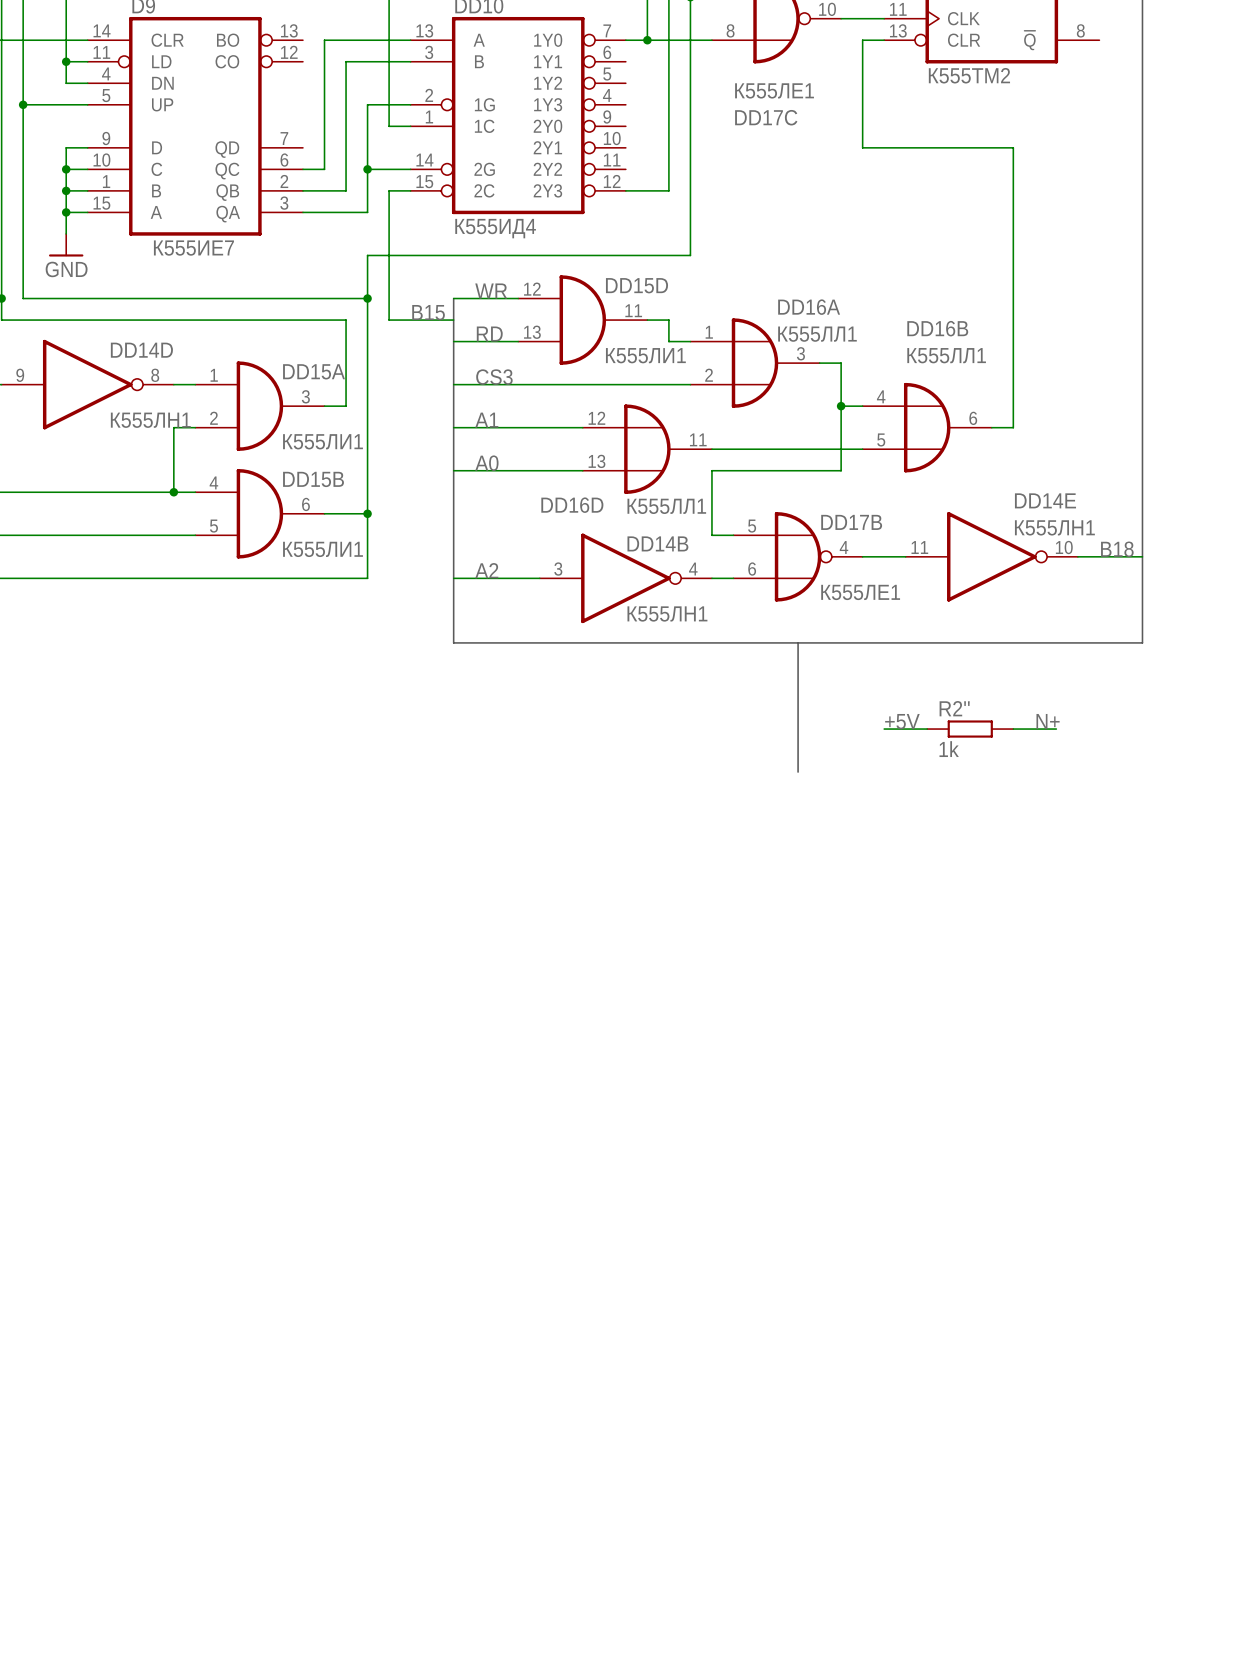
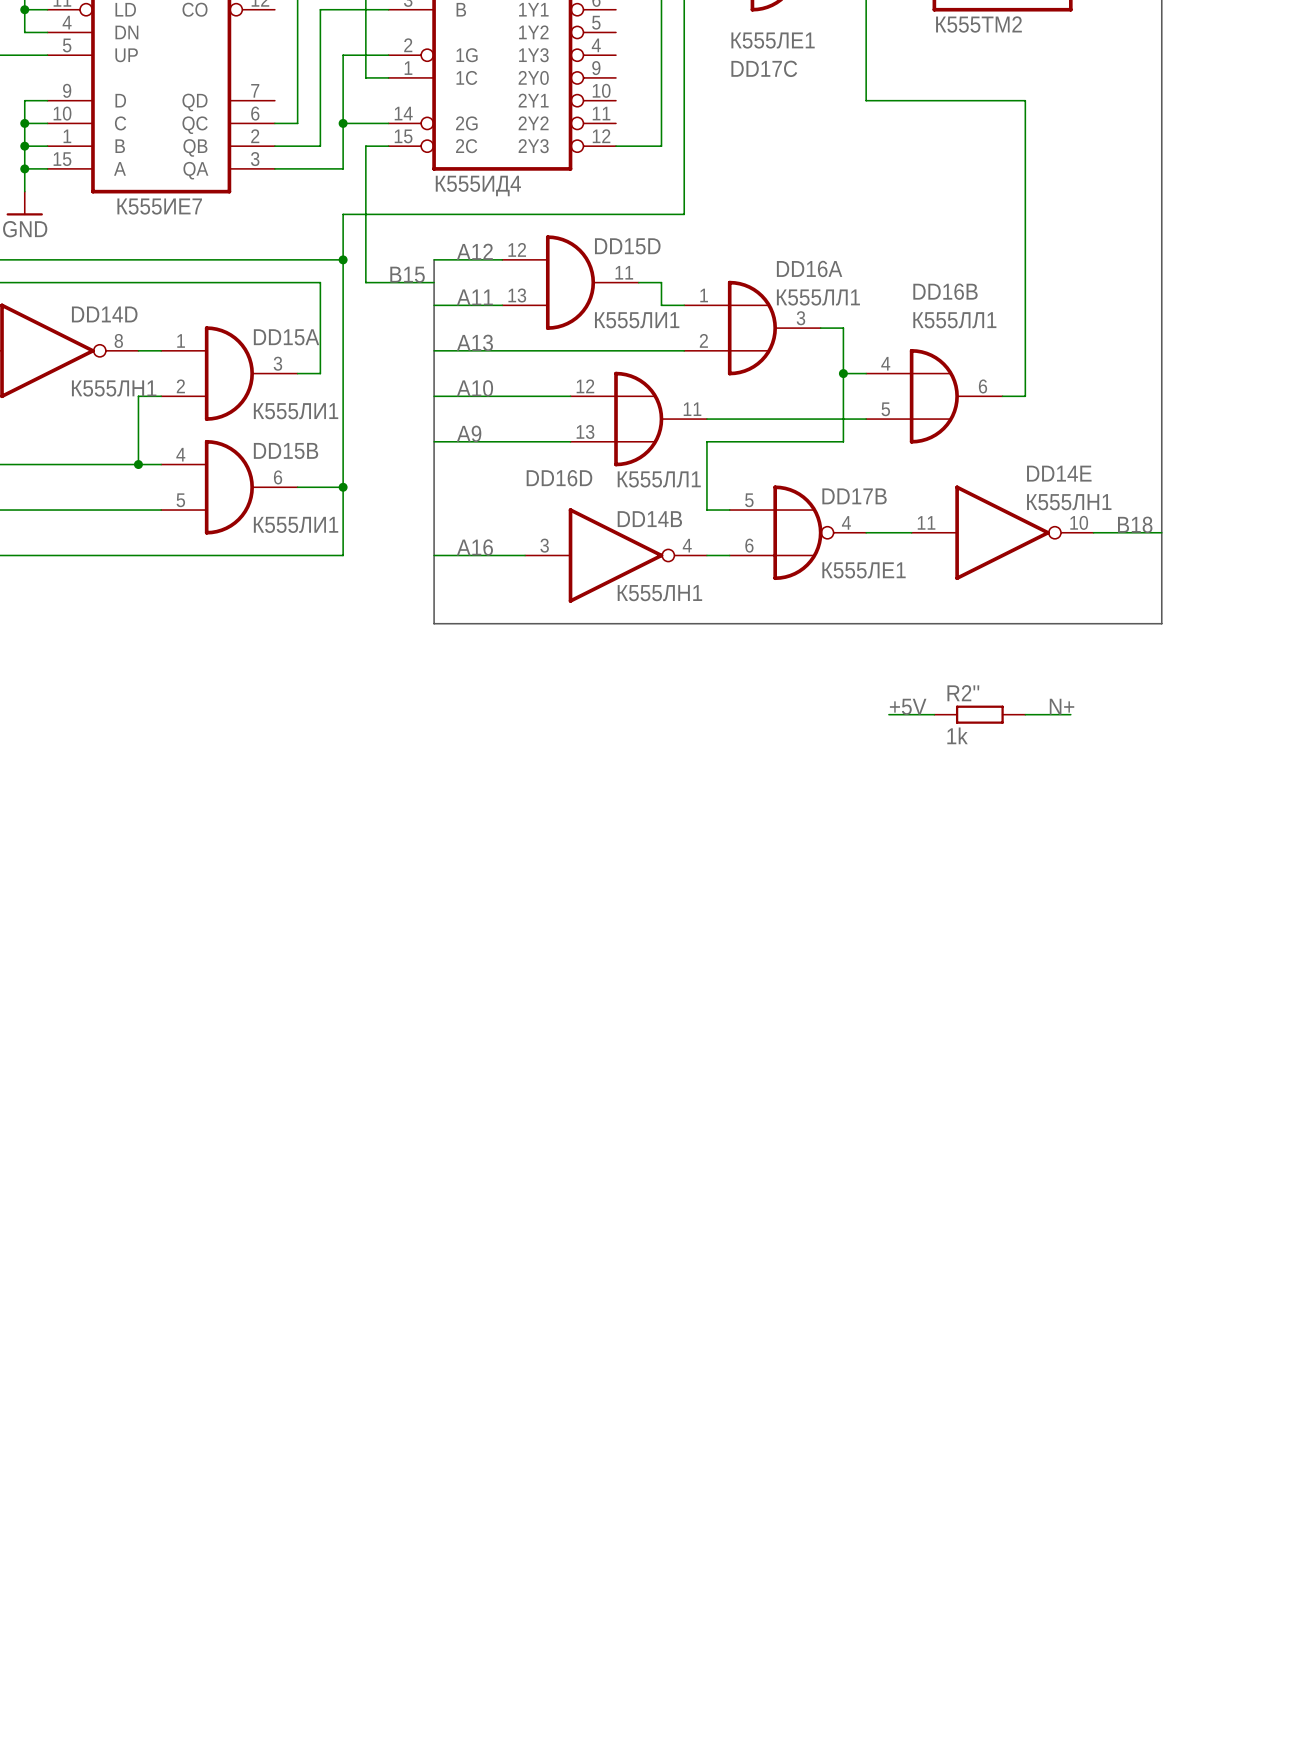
label: WR (491, 290) -> A12 (474, 251)
label: RD (489, 334) -> A11 (474, 297)
label: CS3 (494, 377) -> A13 (474, 342)
label: A1 (486, 420) -> A10 (474, 388)
label: A0 (486, 463) -> A9 (469, 433)
label: A2 (486, 570) -> A16 (474, 547)
bus: (798, 642) (798, 772) -> none

